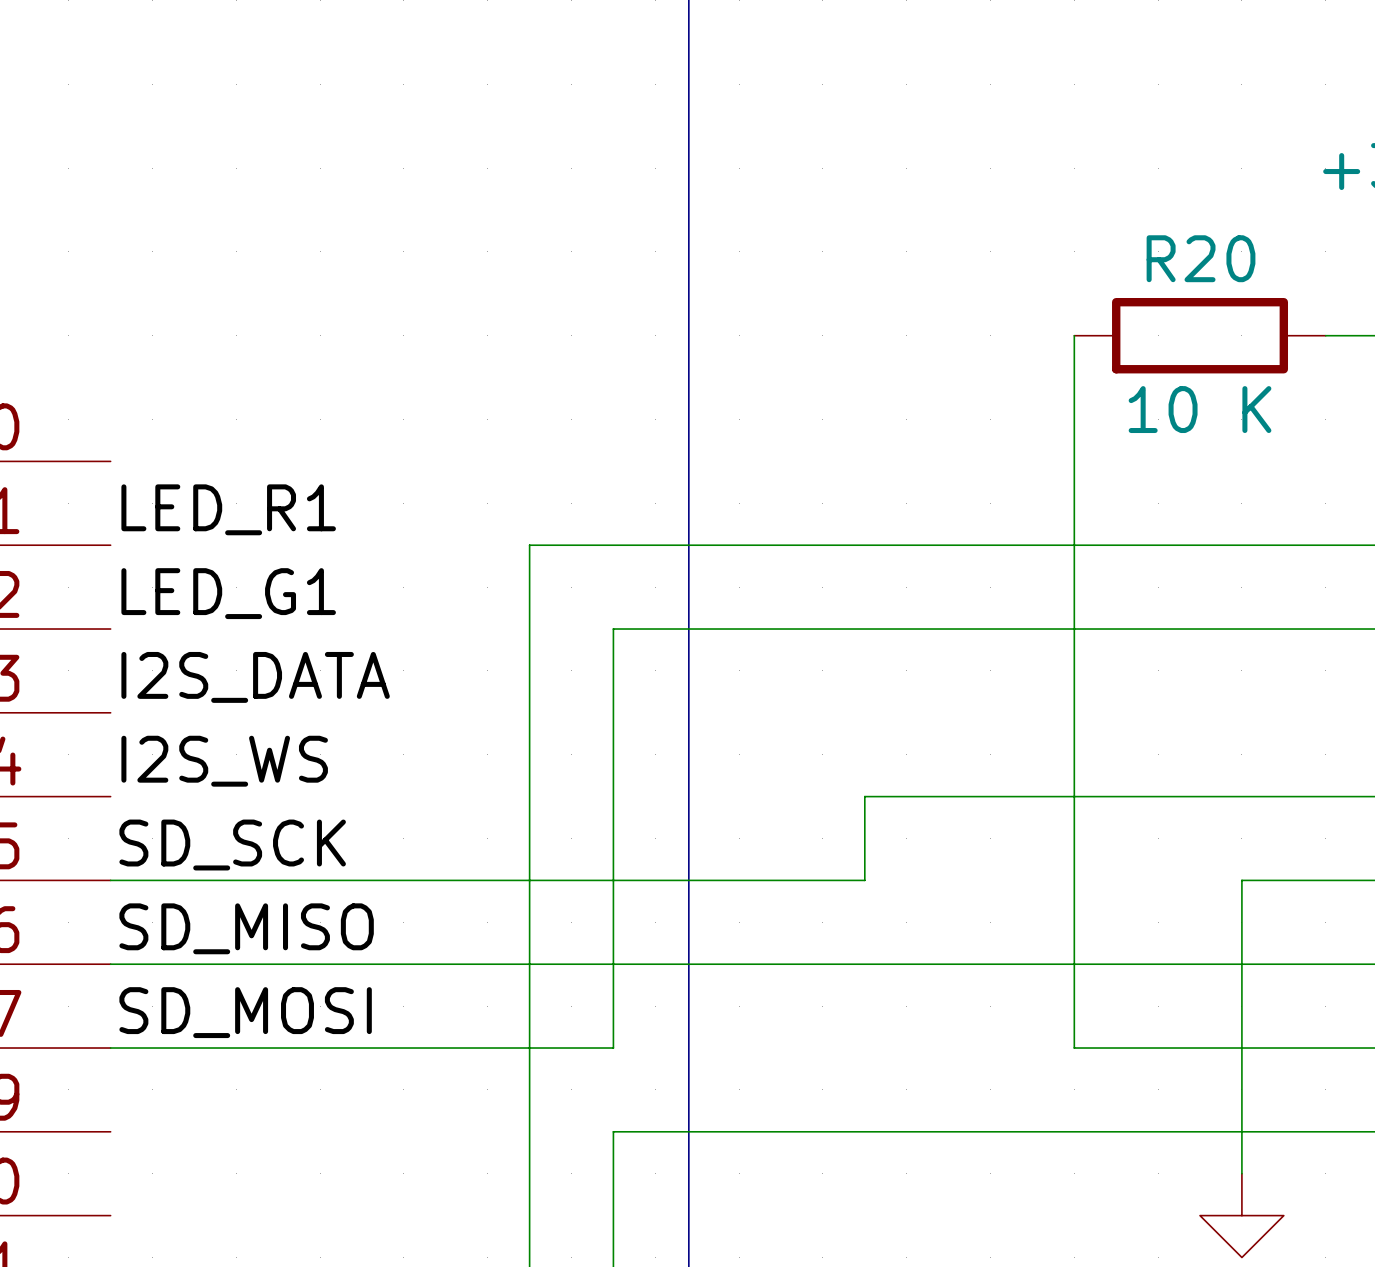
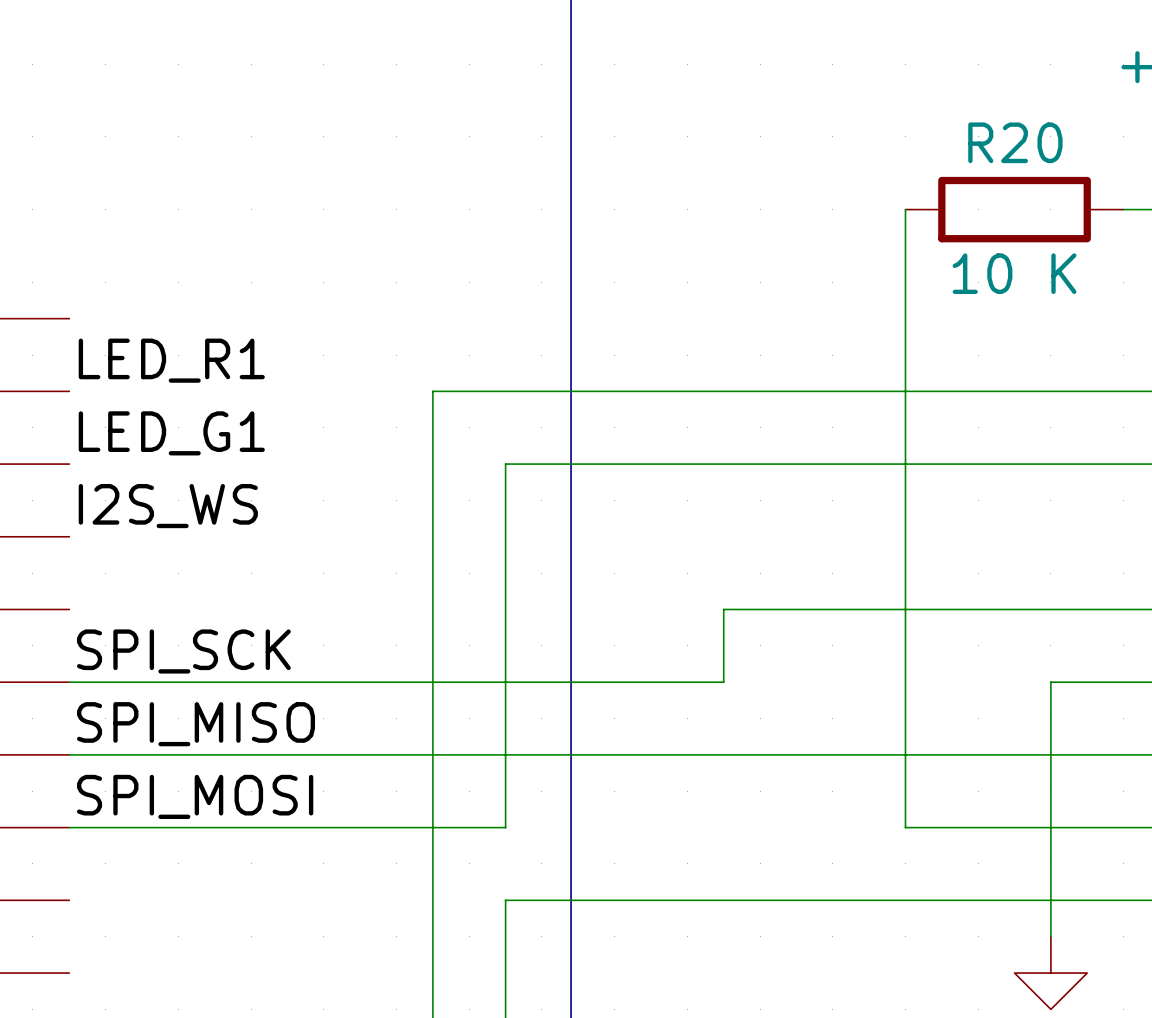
label: I2S_DATA (255, 677) -> I2S_WS (168, 506)
label: I2S_WS (224, 761) -> none
label: SD_SCK (232, 845) -> SPI_SCK (183, 651)
label: SD_MISO (246, 928) -> SPI_MISO (195, 724)
label: SD_MOSI (245, 1012) -> SPI_MOSI (195, 796)

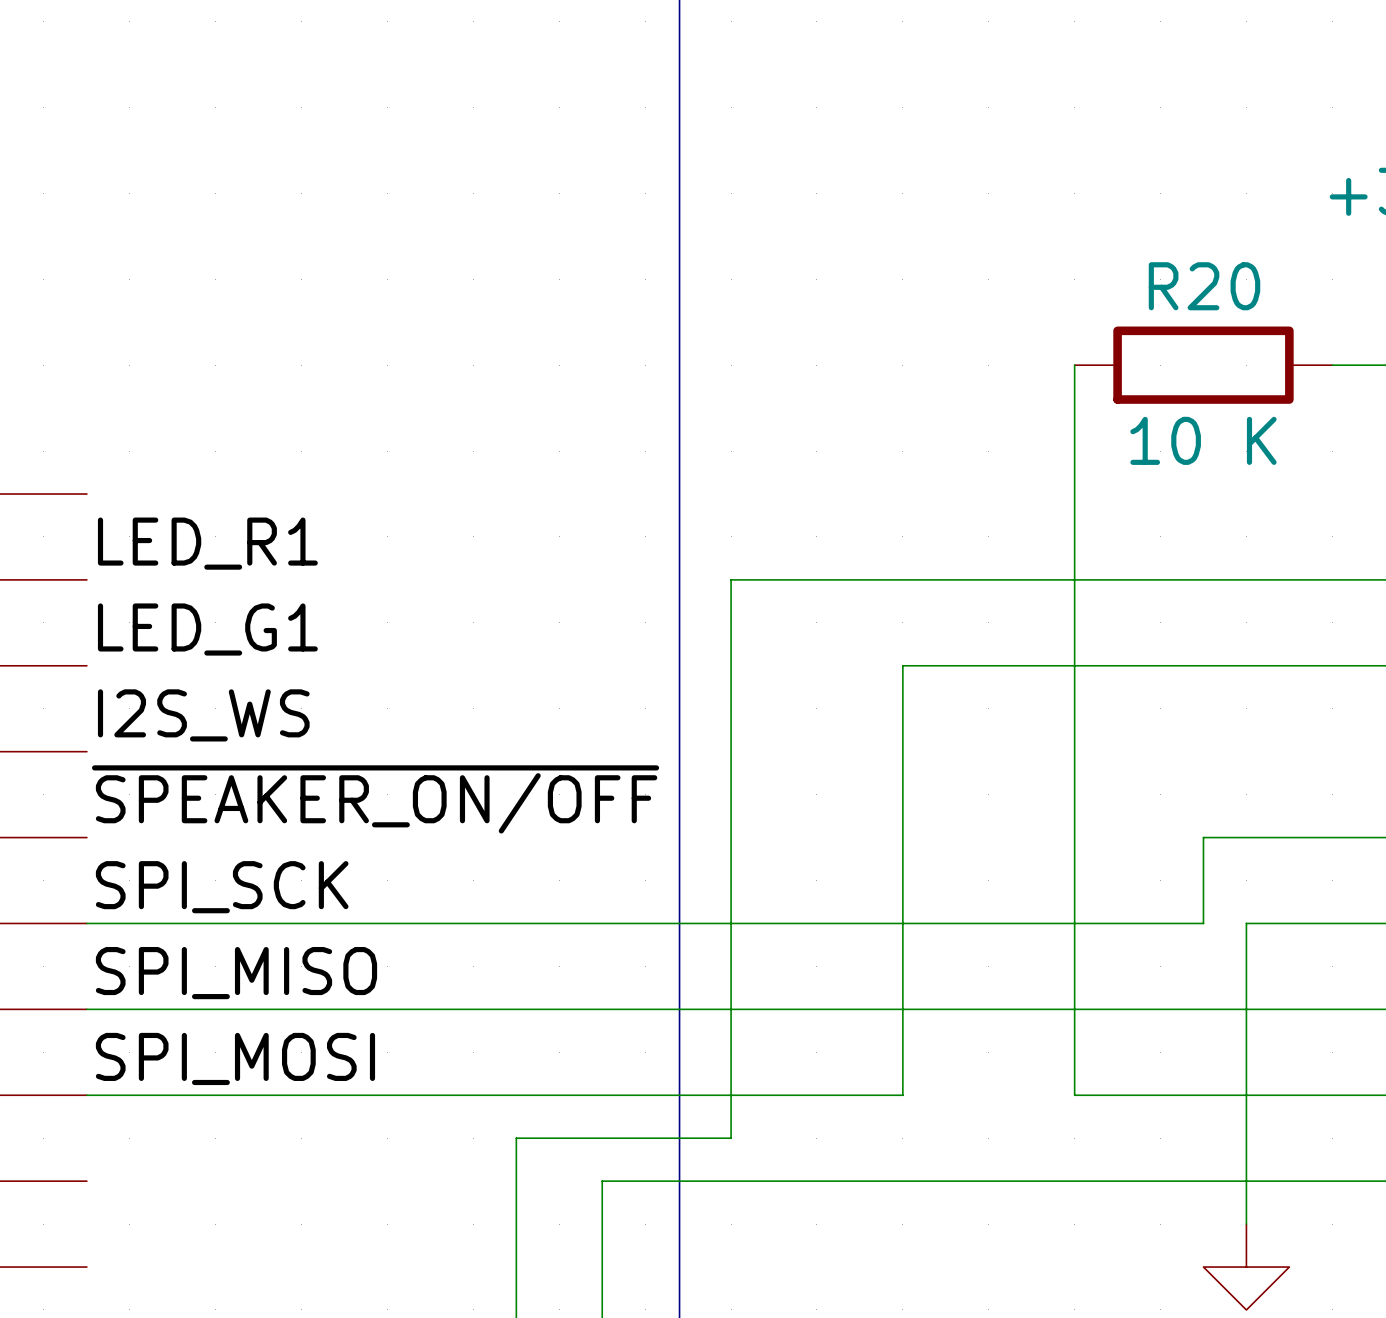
wire: (614, 391) (432, 391) (432, 863) -> (731, 579) (731, 1138) (516, 1138)
wire: (760, 464) (505, 464) (505, 827) -> (902, 665) (902, 1095) (602, 1095)
label: none -> ~{SPEAKER_ON/OFF} (375, 799)
wire: (1014, 609) (723, 609) (723, 682) -> (1203, 837) (1203, 923) (859, 923)

